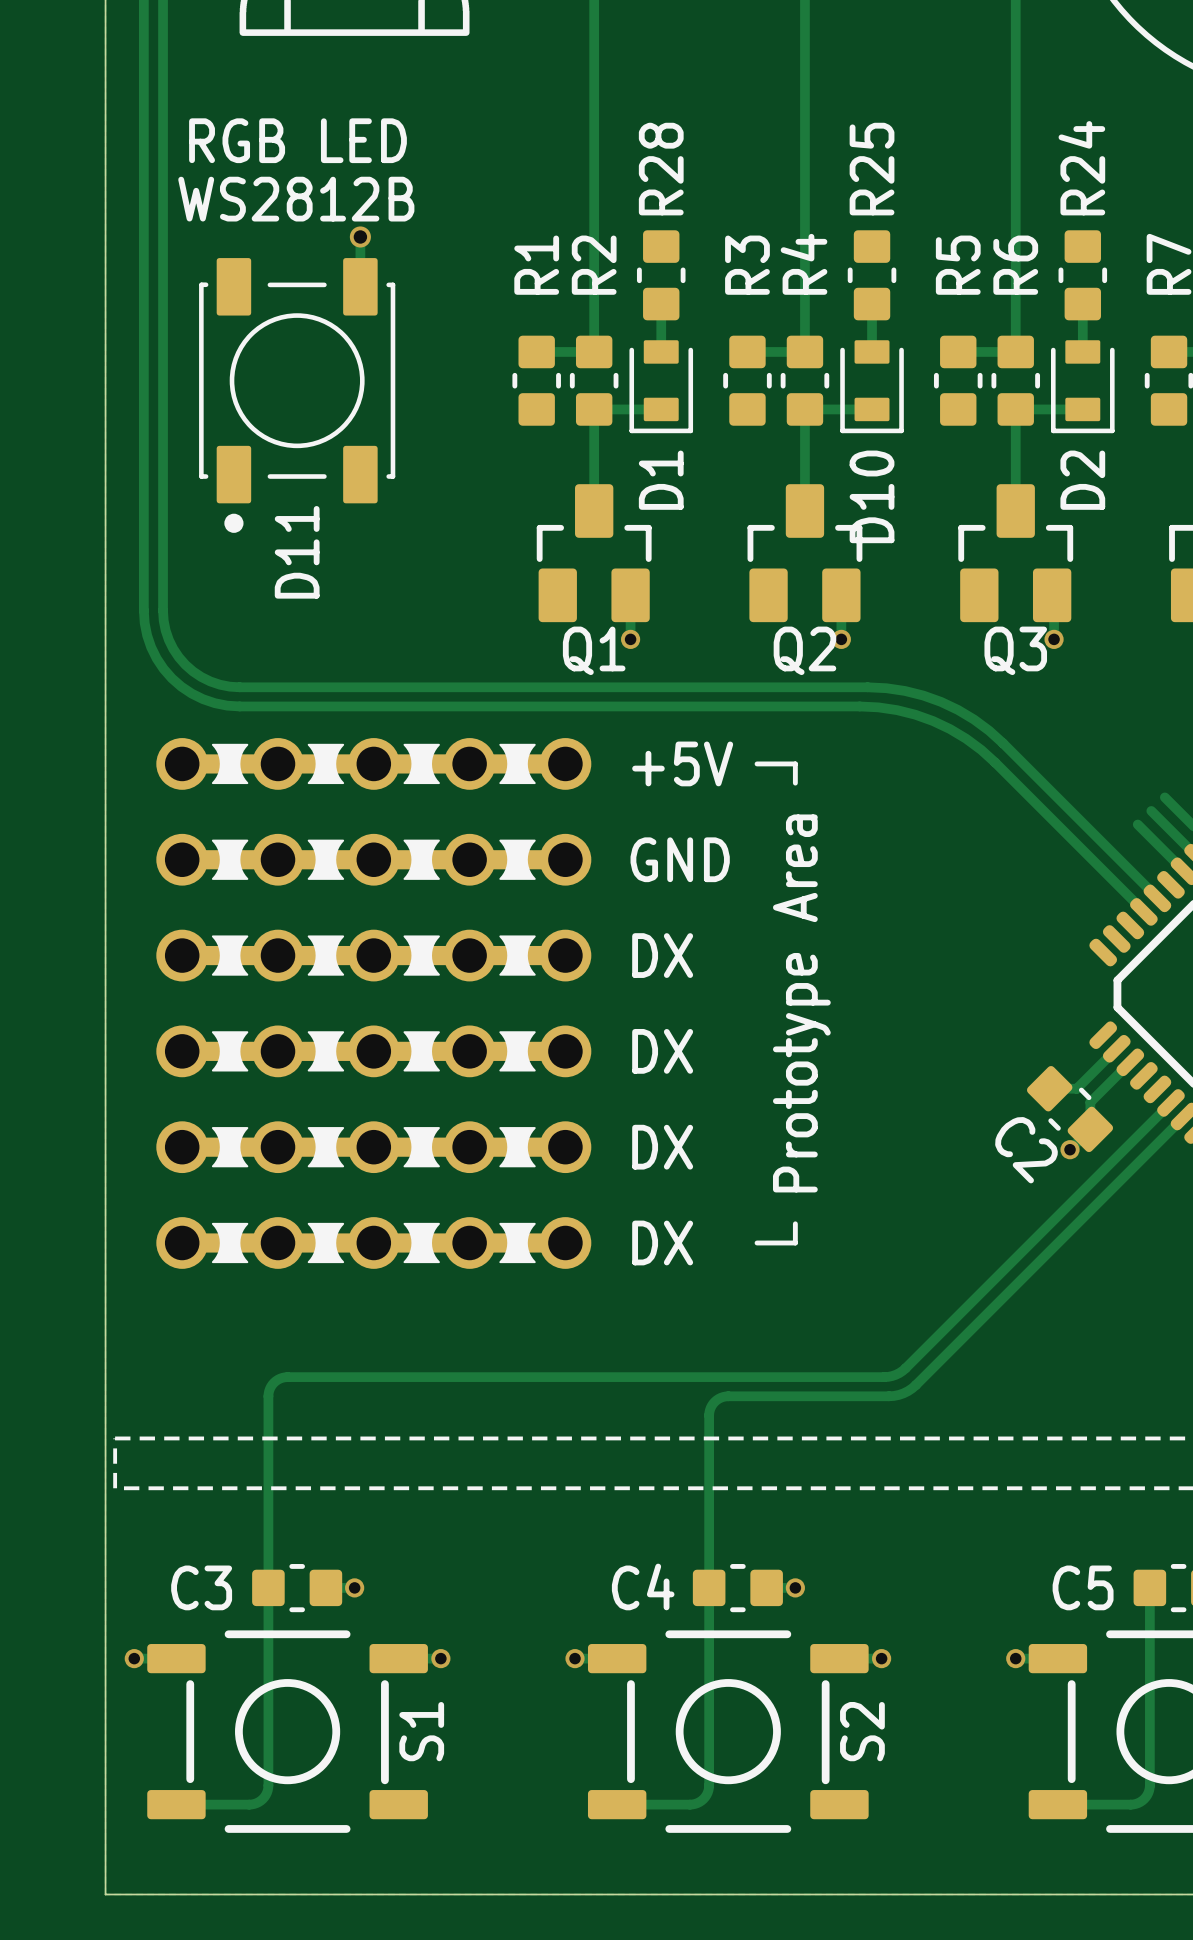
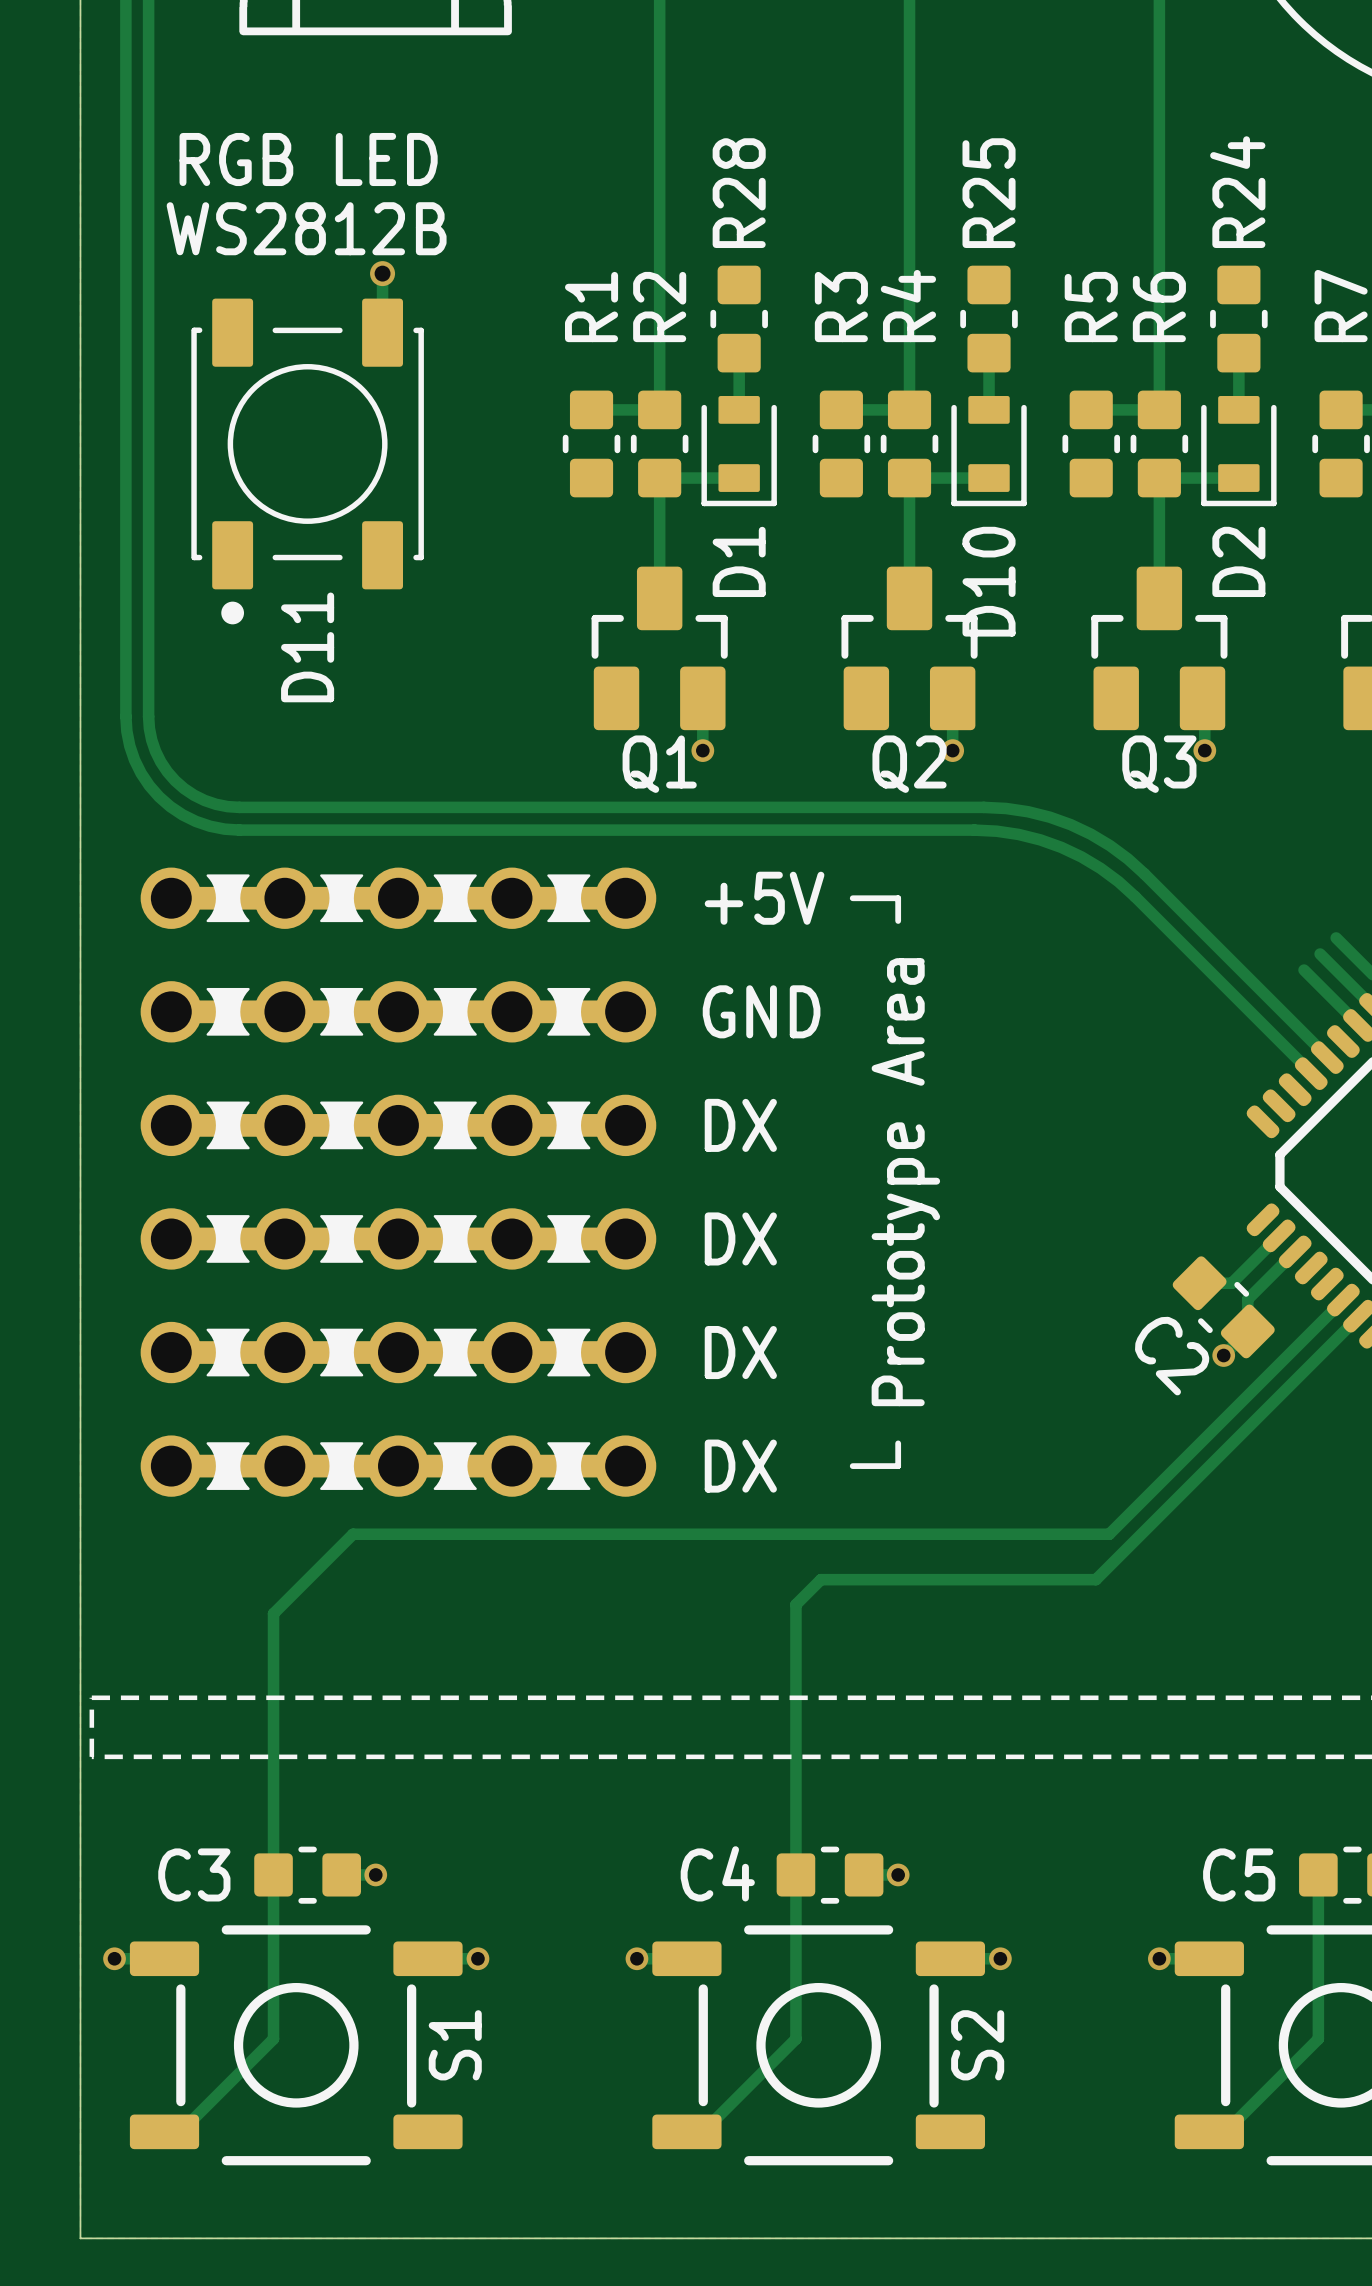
track: (973, 1300) (905, 1368) (899, 1373) (888, 1376) (287, 1377) (274, 1382) (268, 1396) -> (1109, 1534) (353, 1534) (273, 1613) (273, 1647)
track: (962, 1338) (915, 1385) (898, 1394) (725, 1396) (713, 1403) (709, 1415) -> (1095, 1579) (820, 1579) (795, 1604) (795, 1670)
track: (268, 1726) (268, 1787) (262, 1799) (251, 1804) (190, 1804) -> (273, 2038) (180, 2131)
track: (709, 1726) (708, 1787) (703, 1799) (692, 1804) (630, 1804) -> (795, 2038) (703, 2131)
track: (1149, 1726) (1149, 1787) (1144, 1799) (1133, 1804) (1071, 1804) -> (1318, 2038) (1225, 2131)

